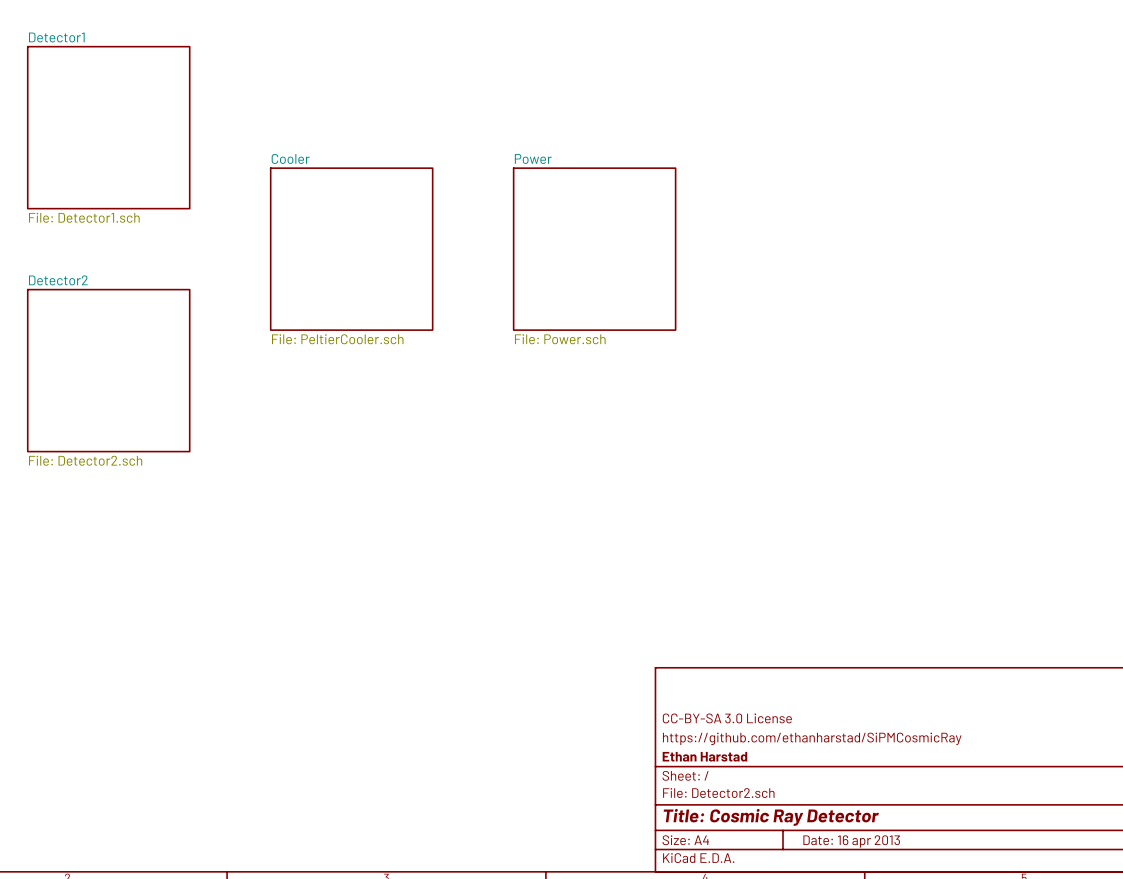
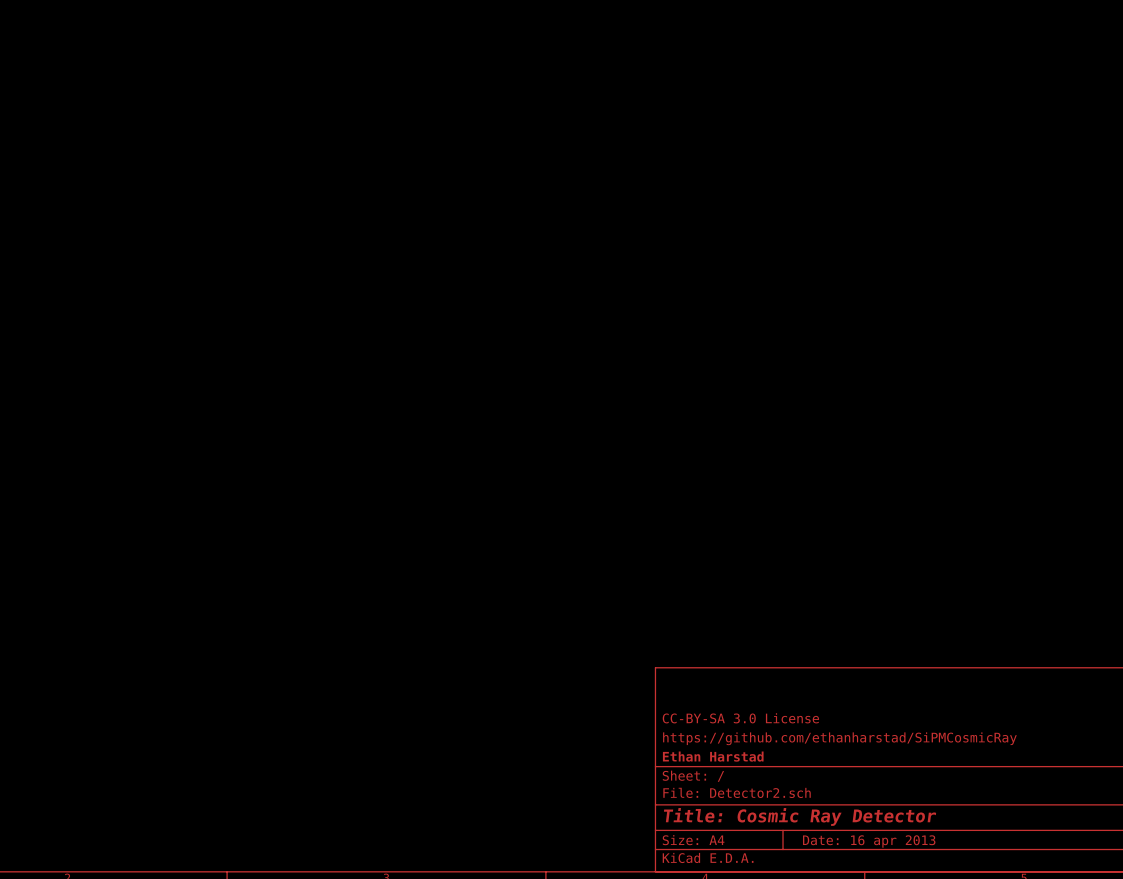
sheet Detector1: File: Detector1.sch (108, 127) -> none
sheet Cooler: File: PeltierCooler.sch (351, 249) -> none
sheet Power: File: Power.sch (594, 249) -> none
sheet Detector2: File: Detector2.sch (108, 370) -> none

